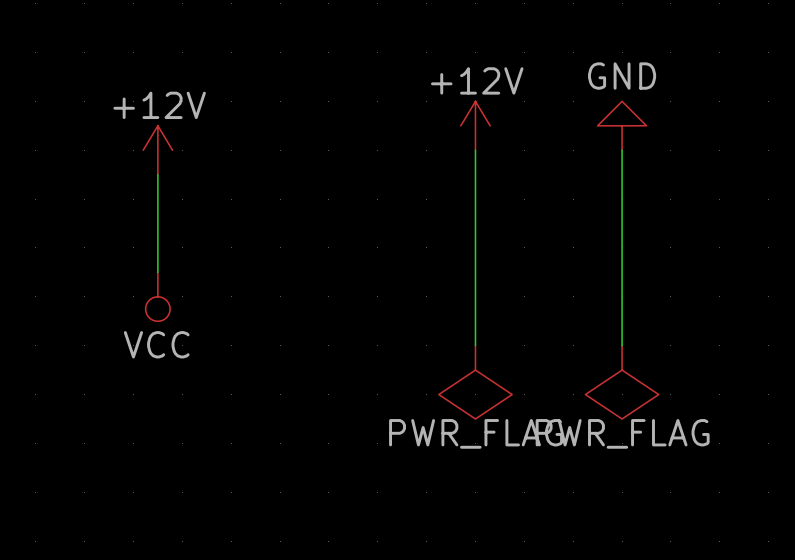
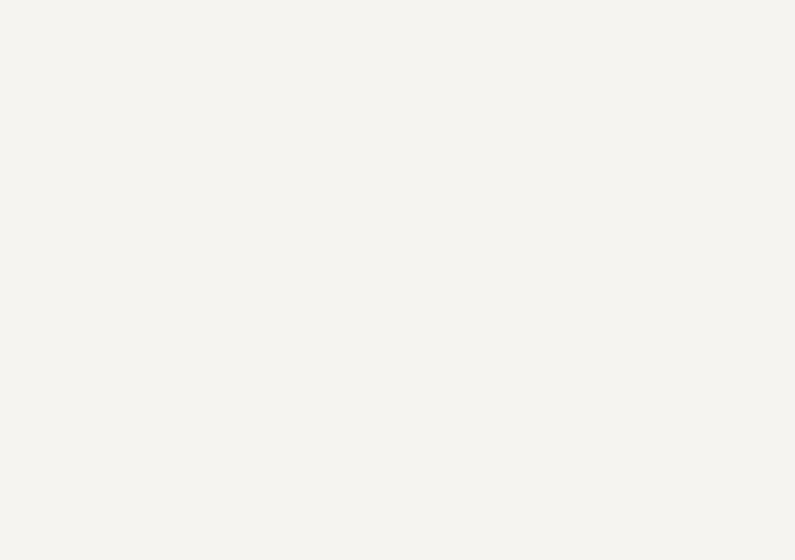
power symbol: +12V (475, 125) -> none
power symbol: GND (622, 125) -> none
power symbol: +12V (157, 150) -> none
wire: (475, 150) (475, 345) -> none
wire: (622, 150) (622, 345) -> none
wire: (157, 174) (157, 272) -> none
power symbol: VCC (157, 296) -> none
power symbol: PWR_FLAG (475, 382) -> none
power symbol: PWR_FLAG (622, 382) -> none

